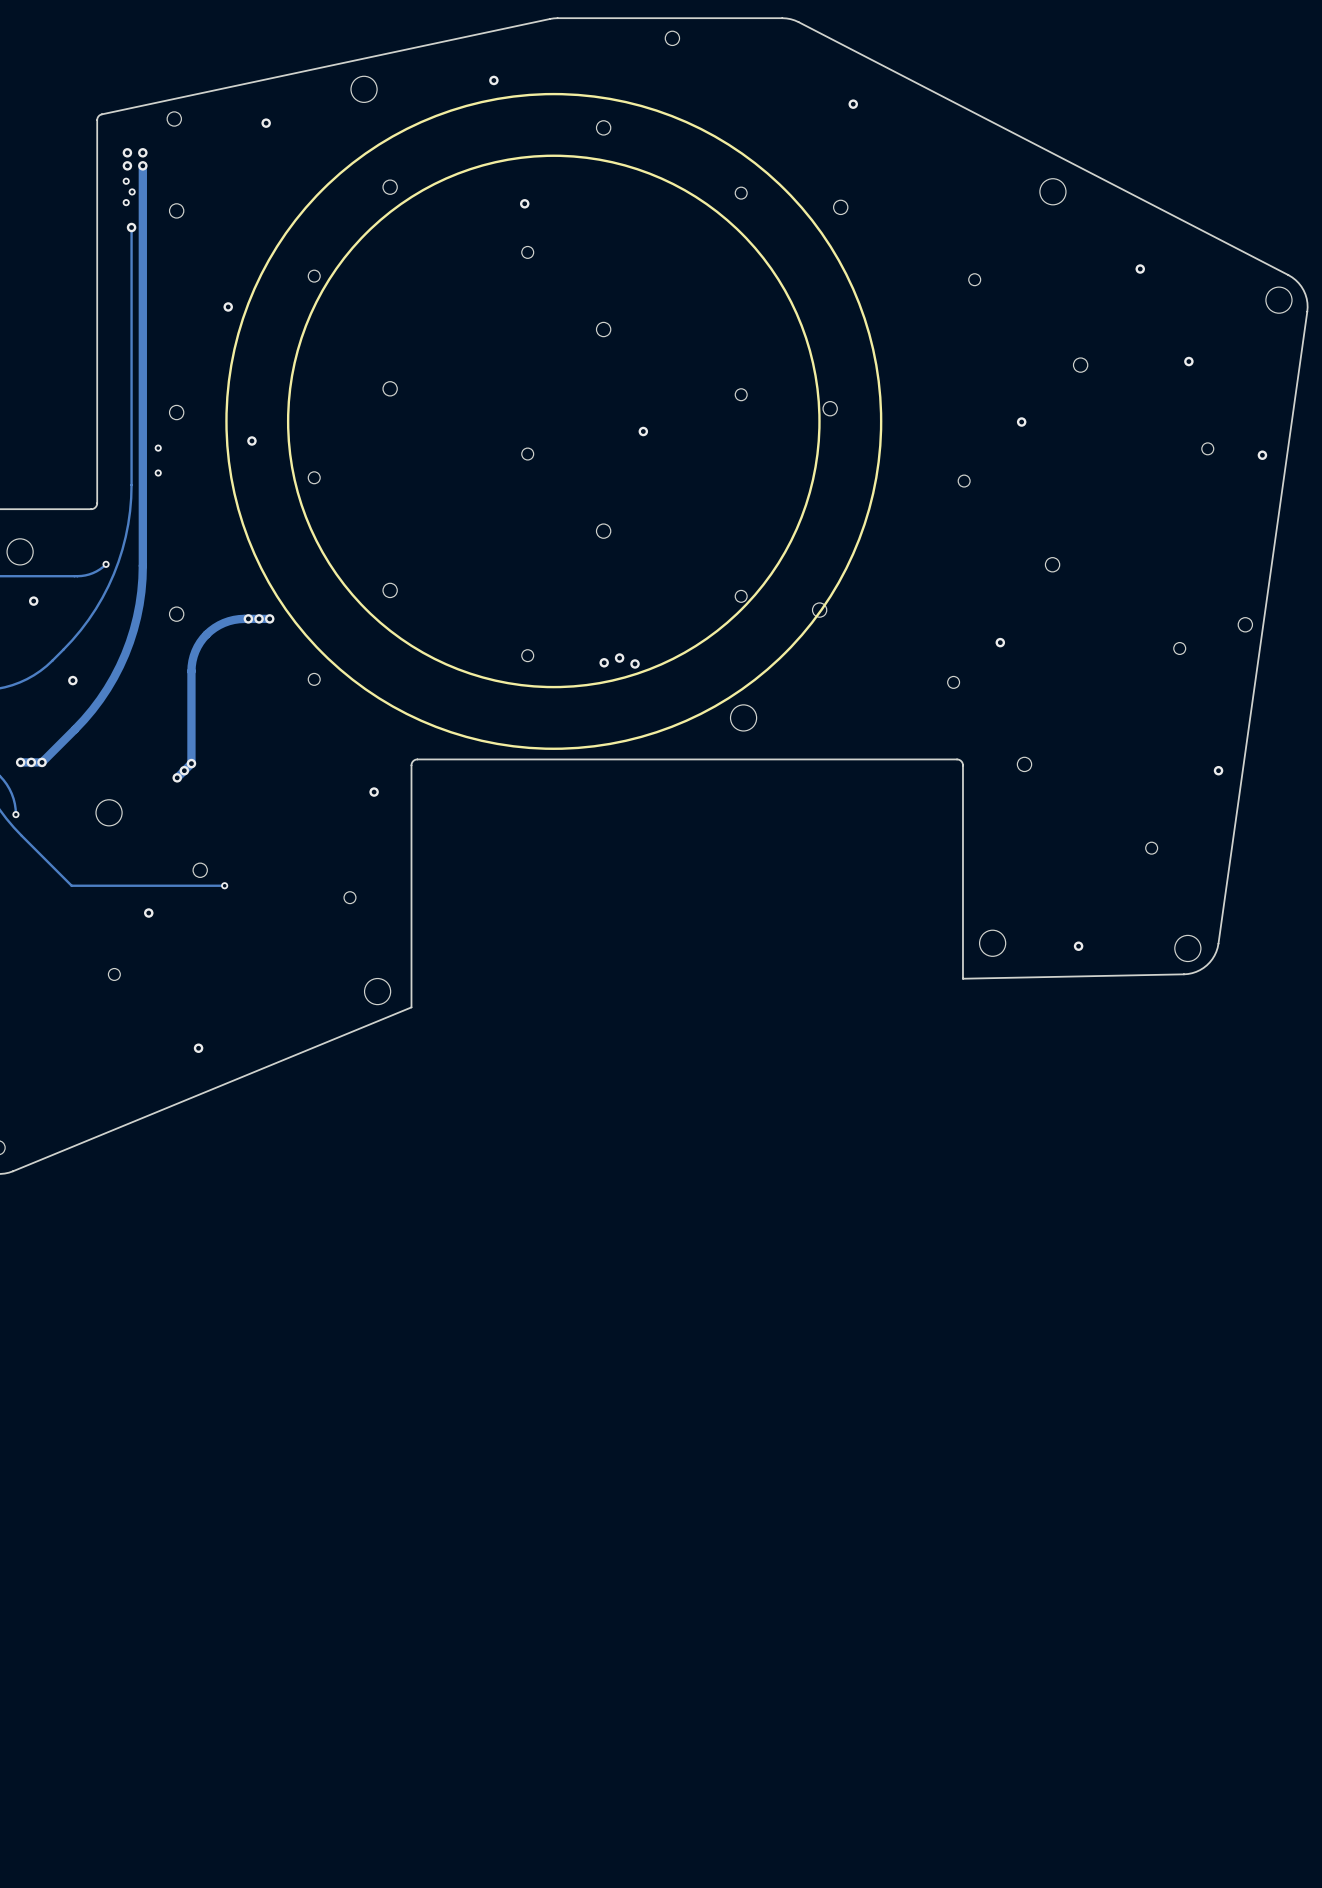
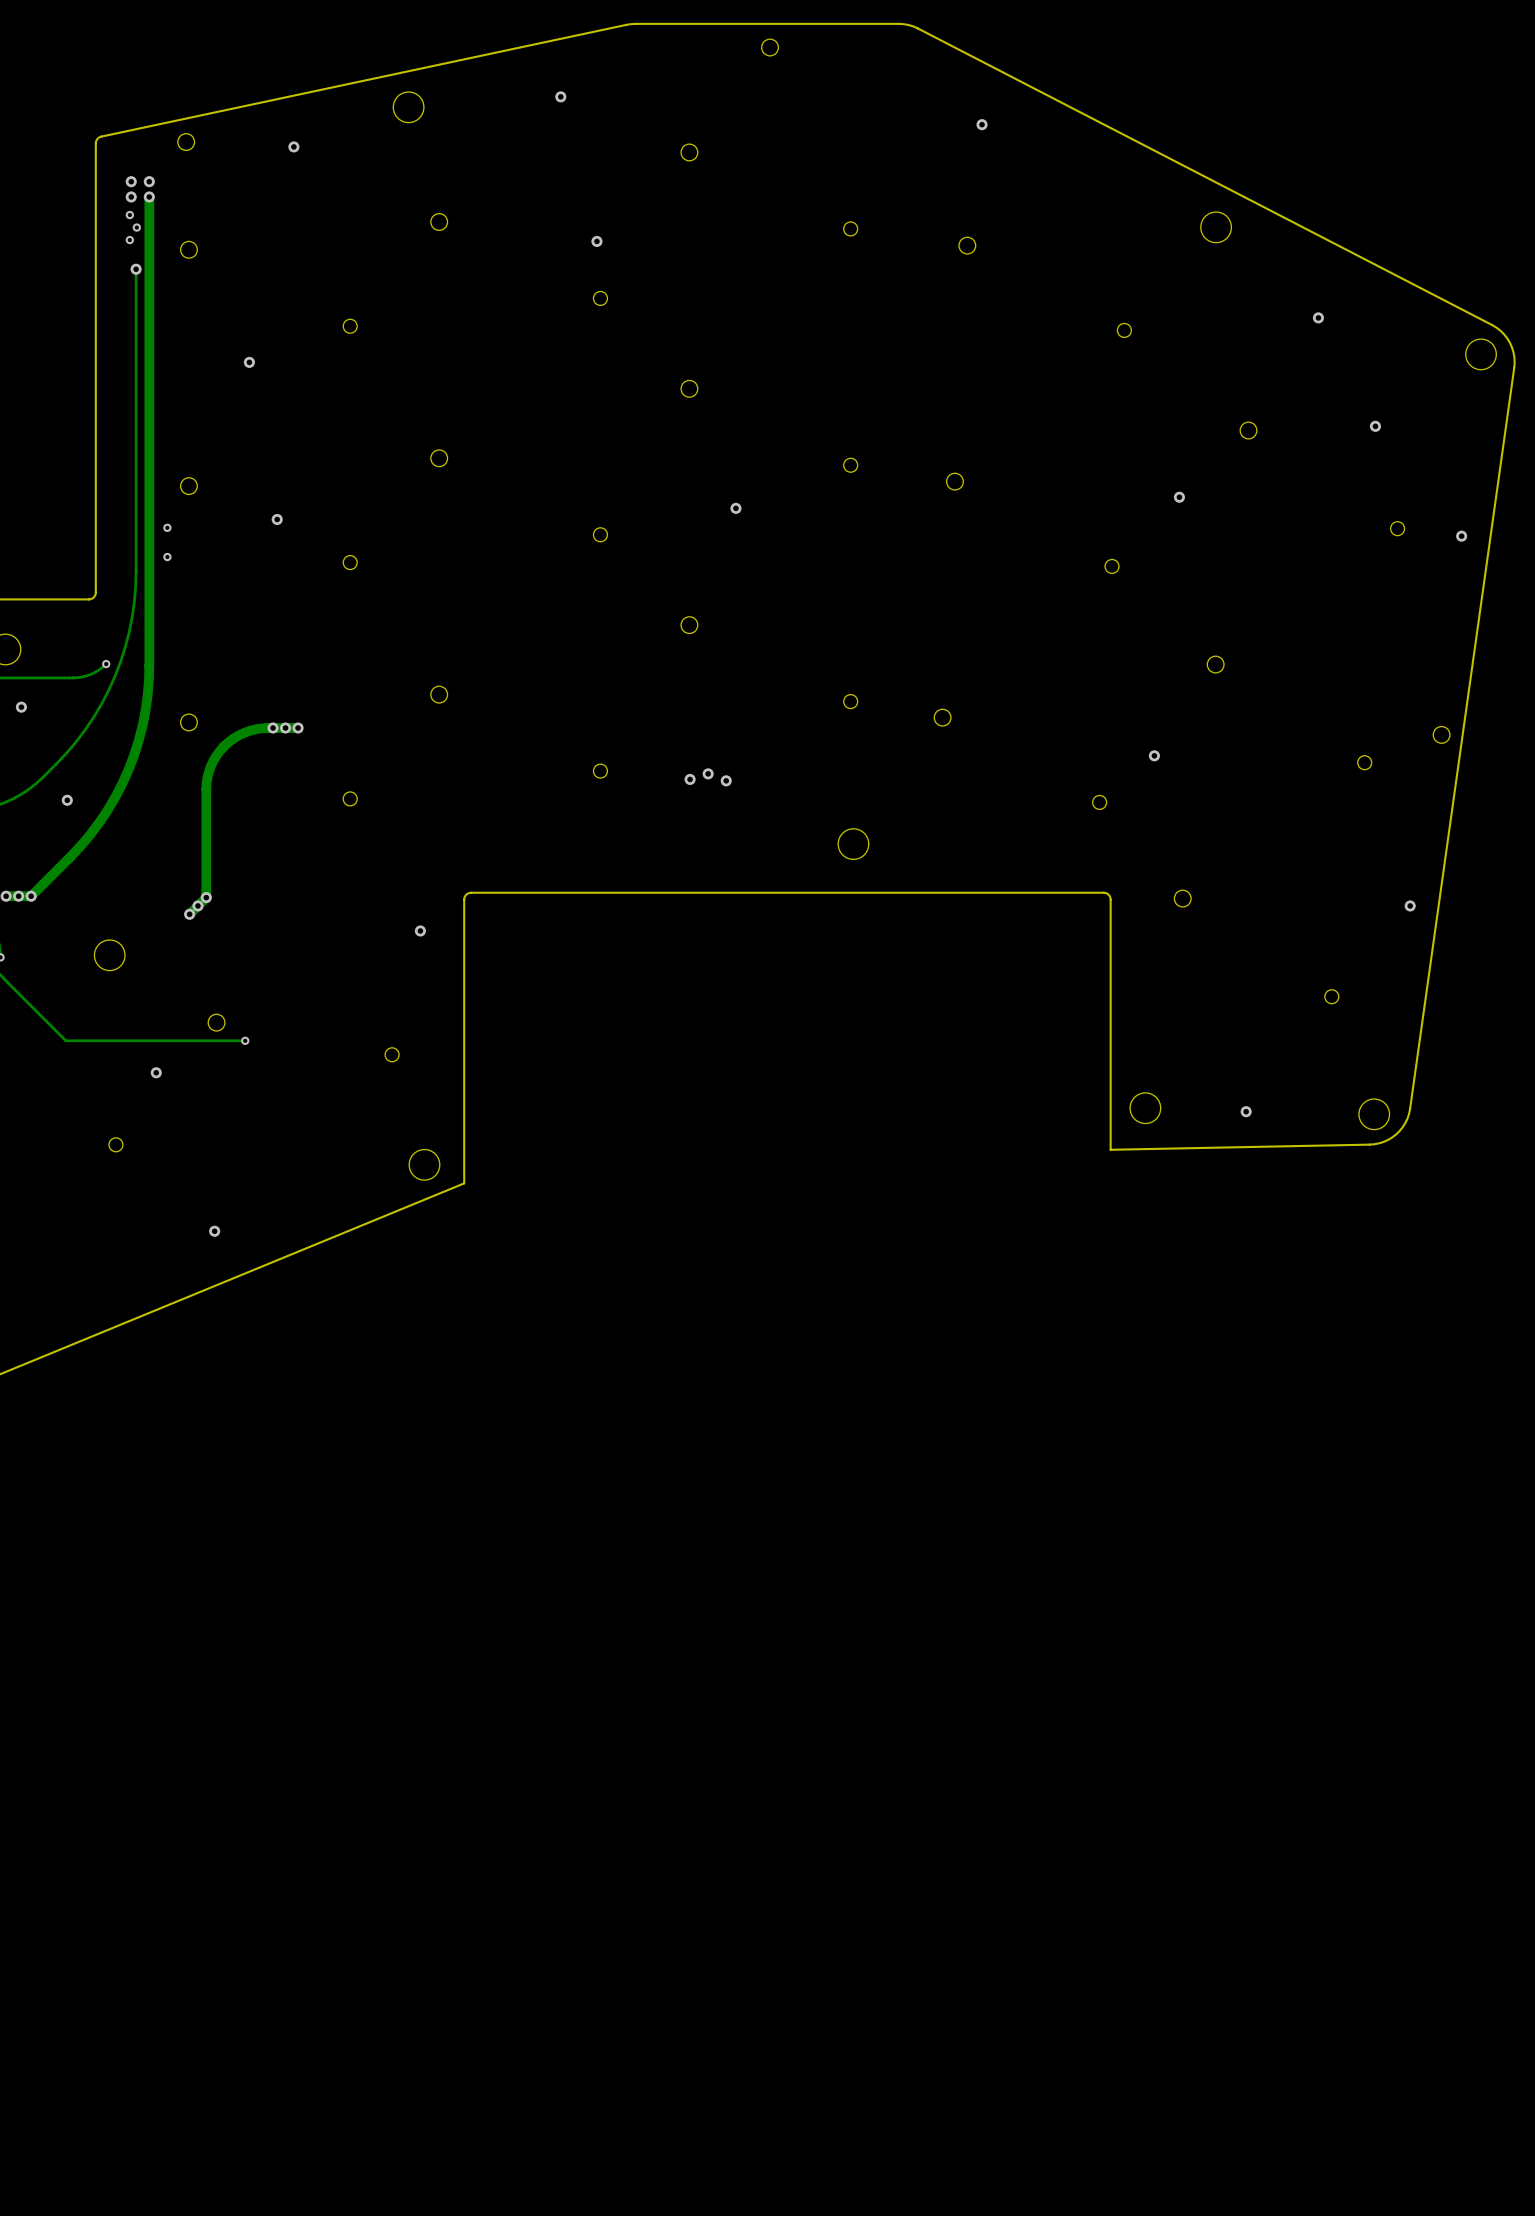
drawing: [225, 92, 883, 750] -> none

